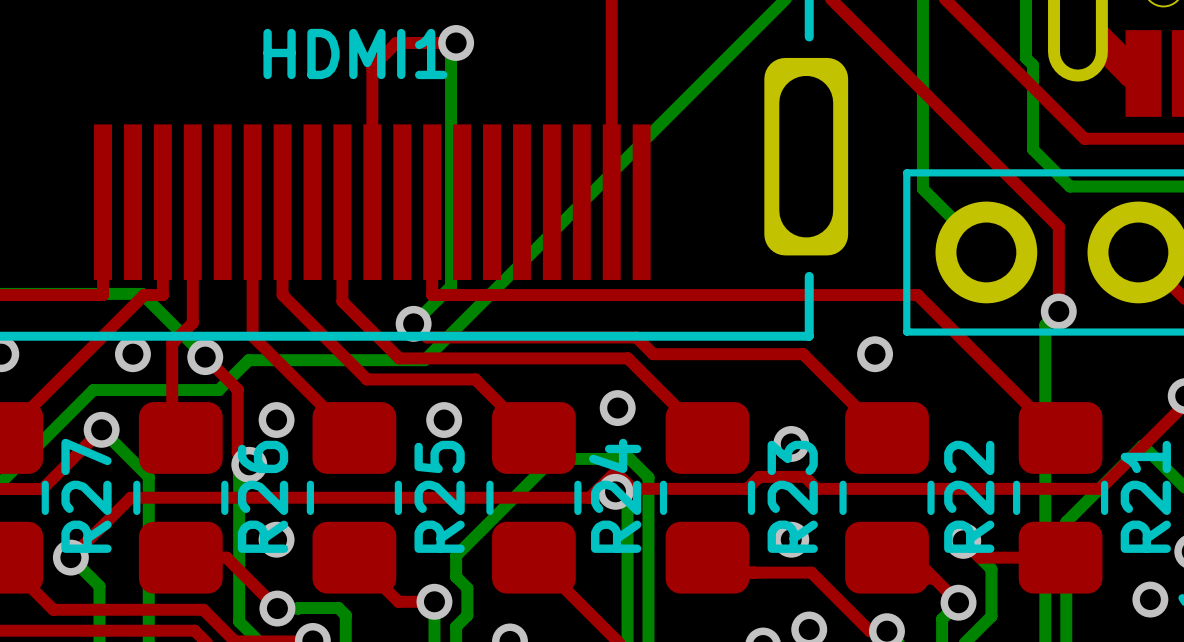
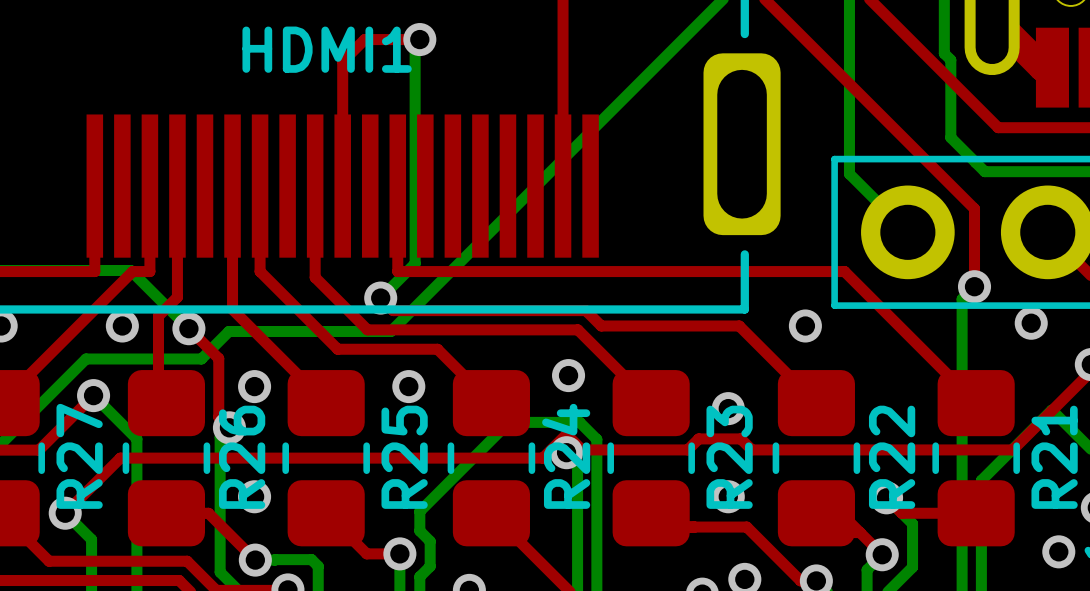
via: none -> (1031, 323)

